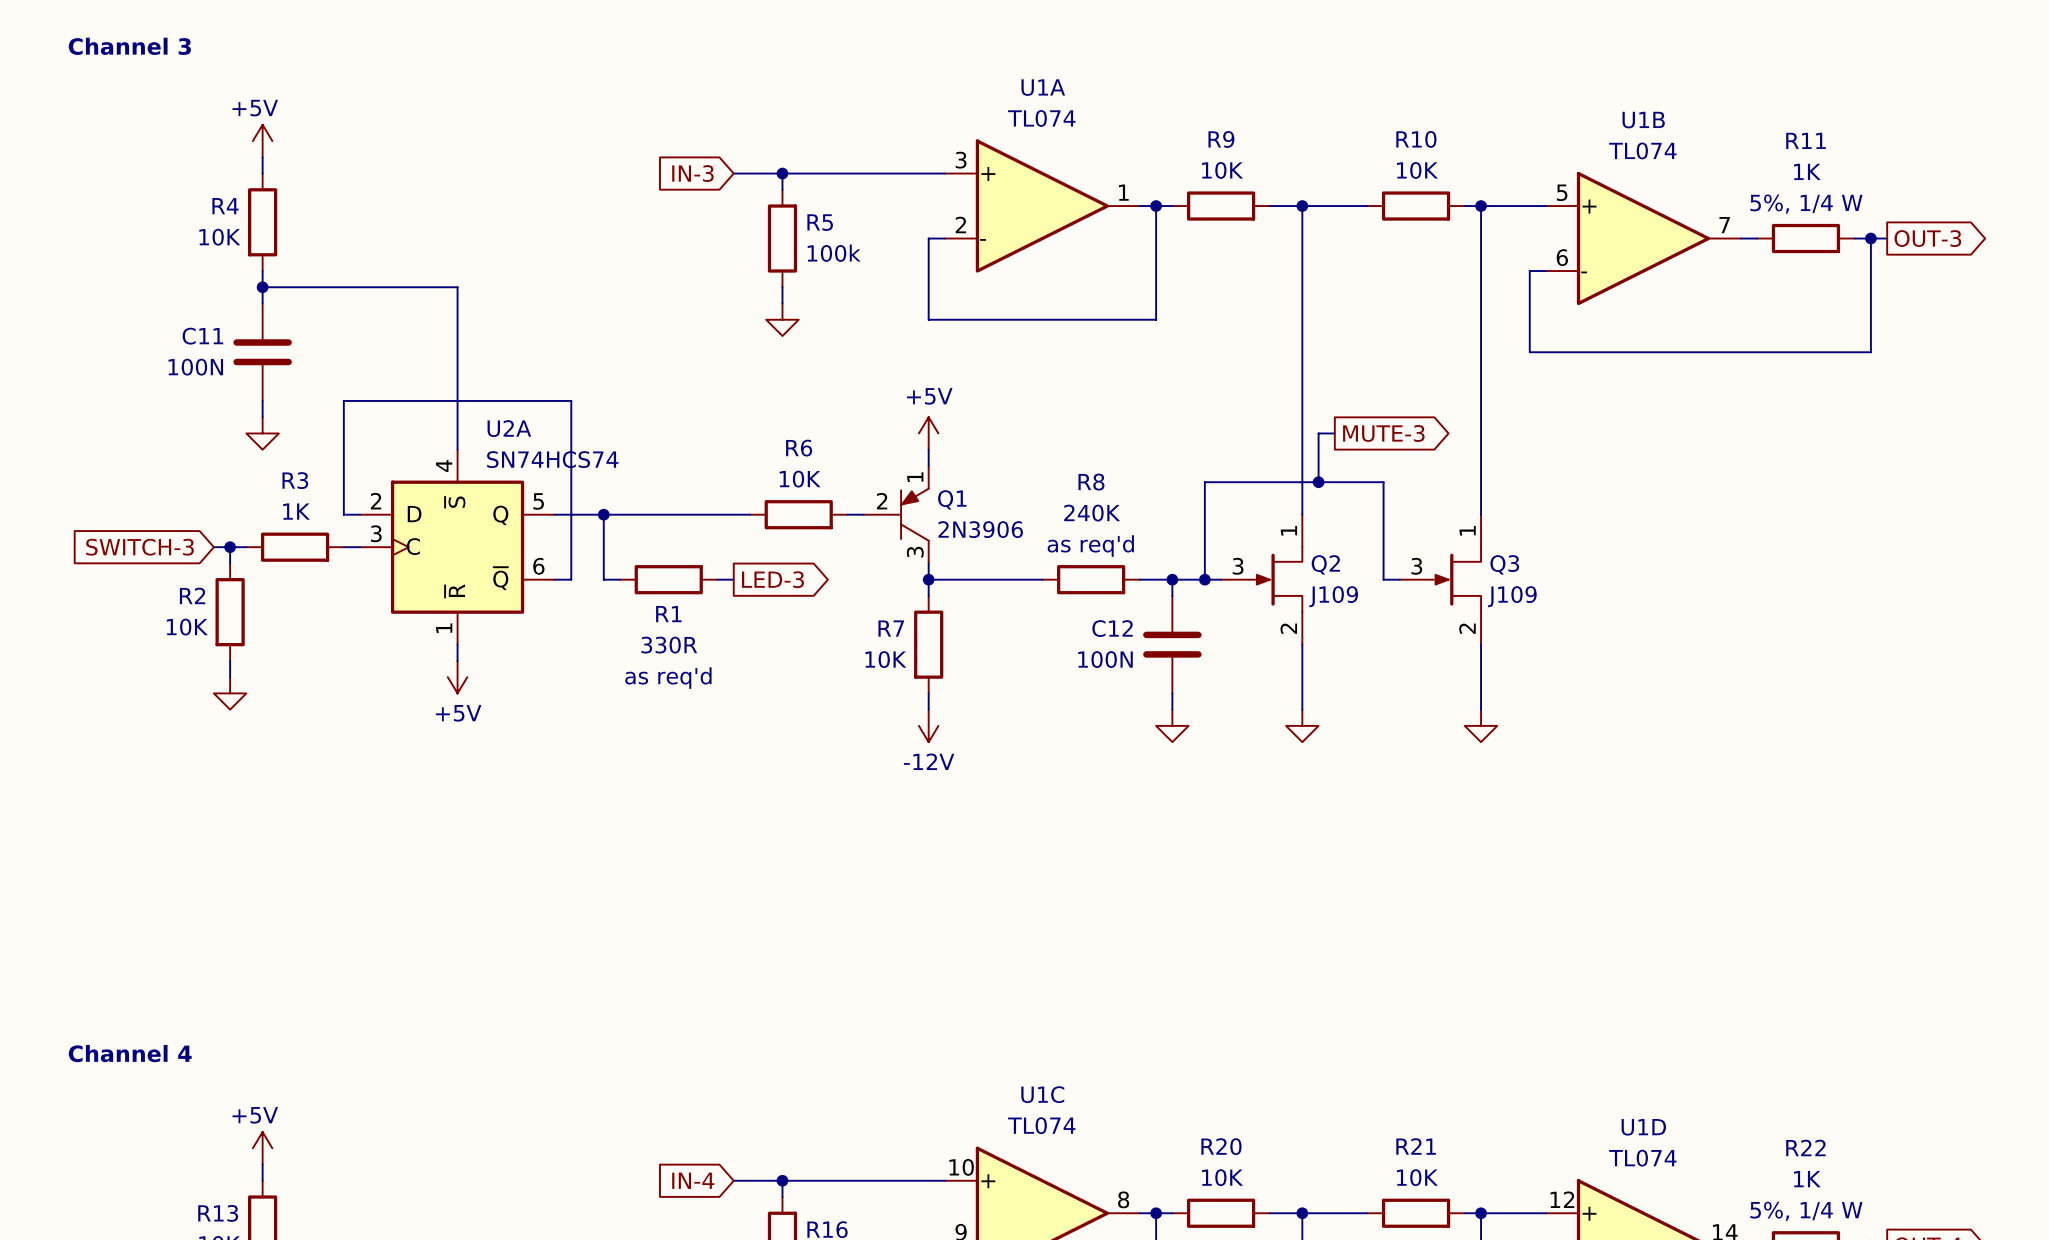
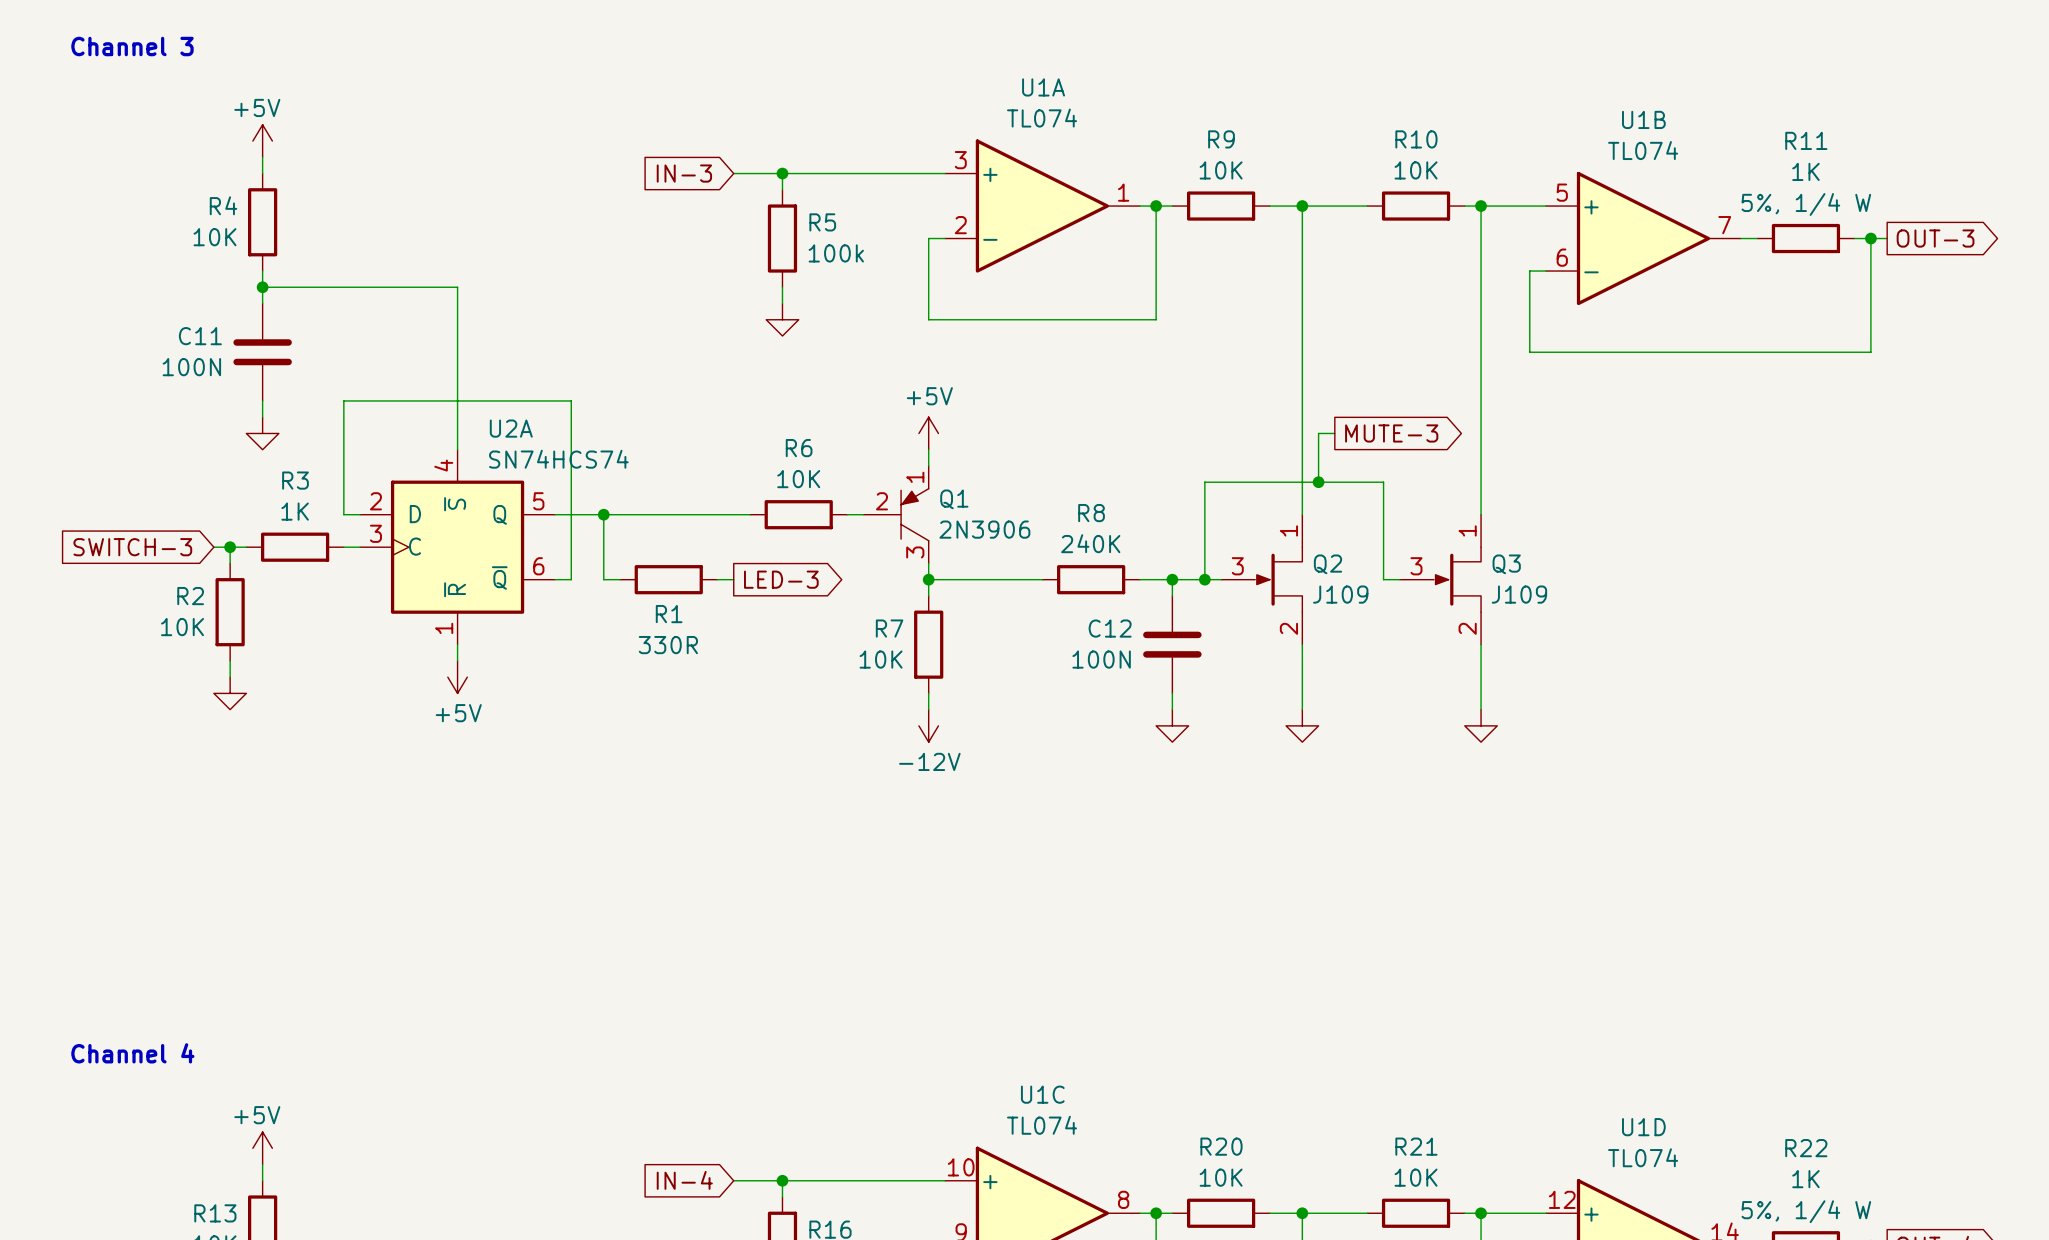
R8 name position: R8 (1091, 482) -> R8 (1091, 513)
R8 value position: 240K (1092, 513) -> 240K (1090, 543)
R8 text: as req'd (1090, 546) -> none
R1 text: as req'd (668, 678) -> none

